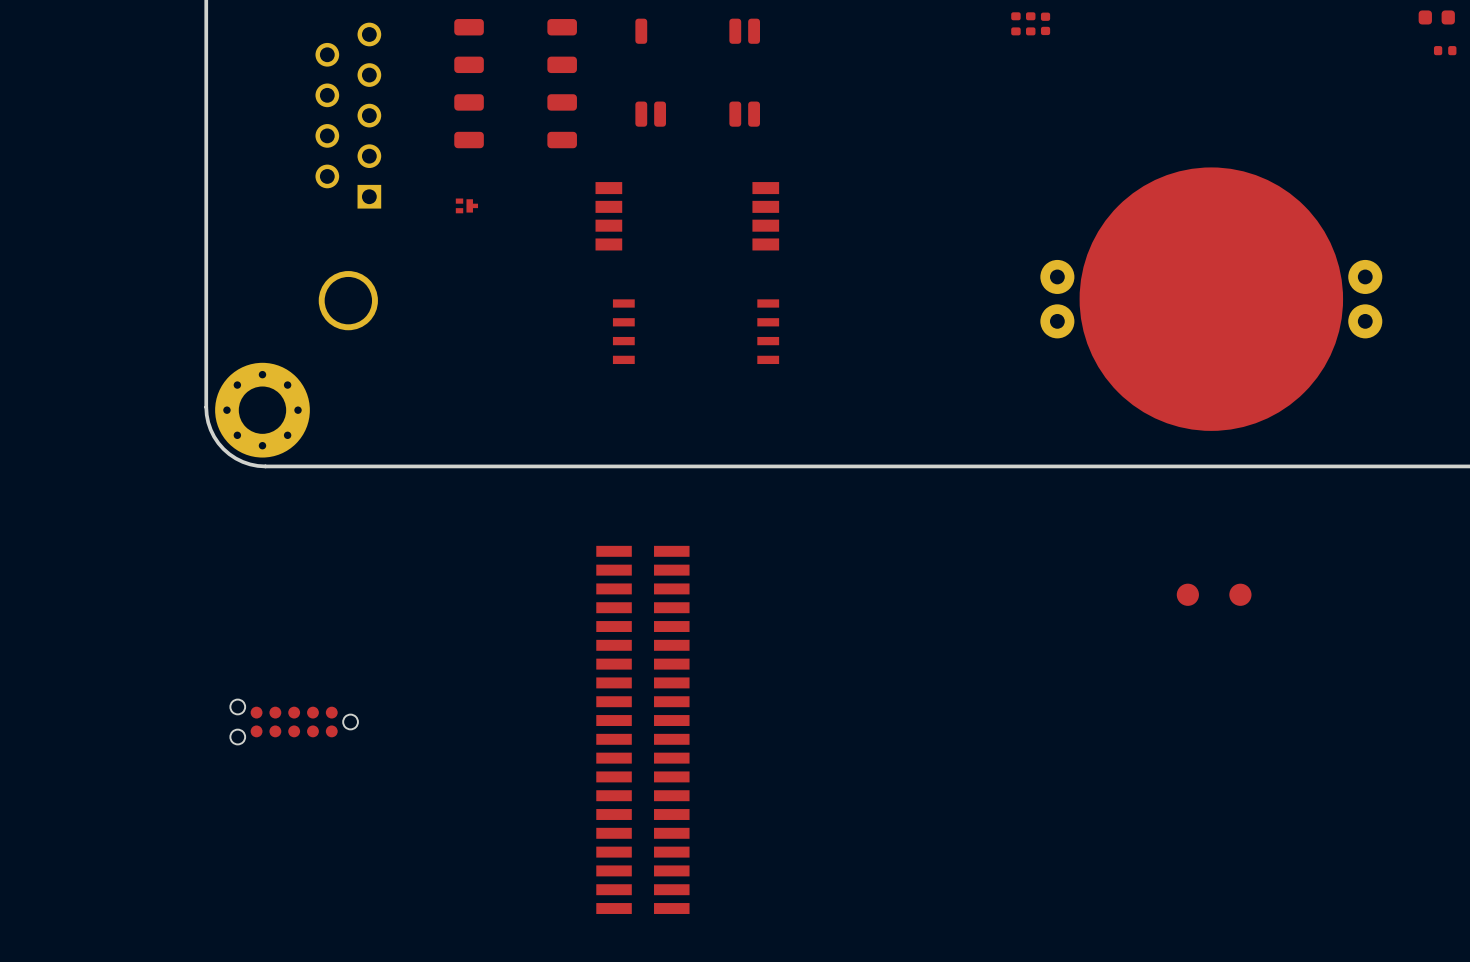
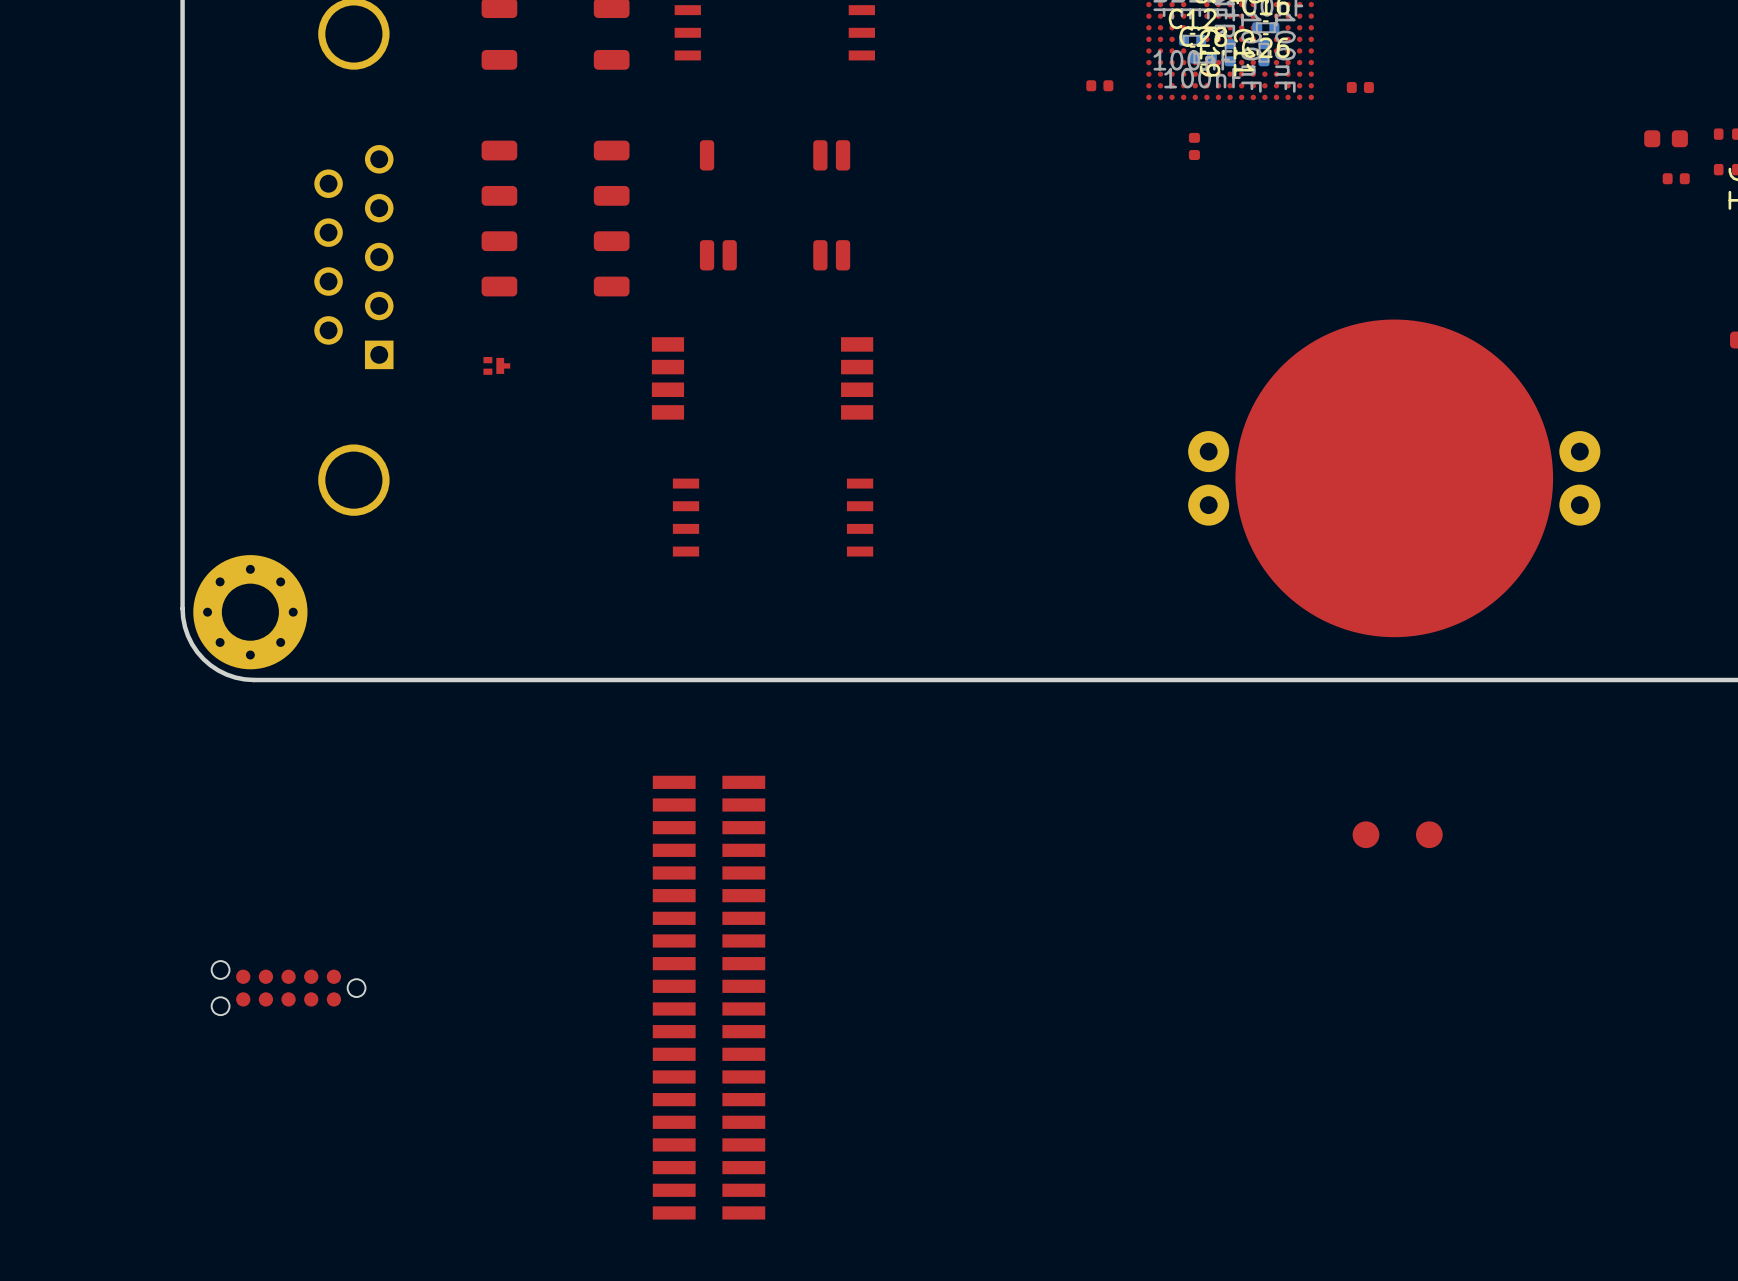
part: (1015, 23) -> none
part: (1030, 23) -> none

